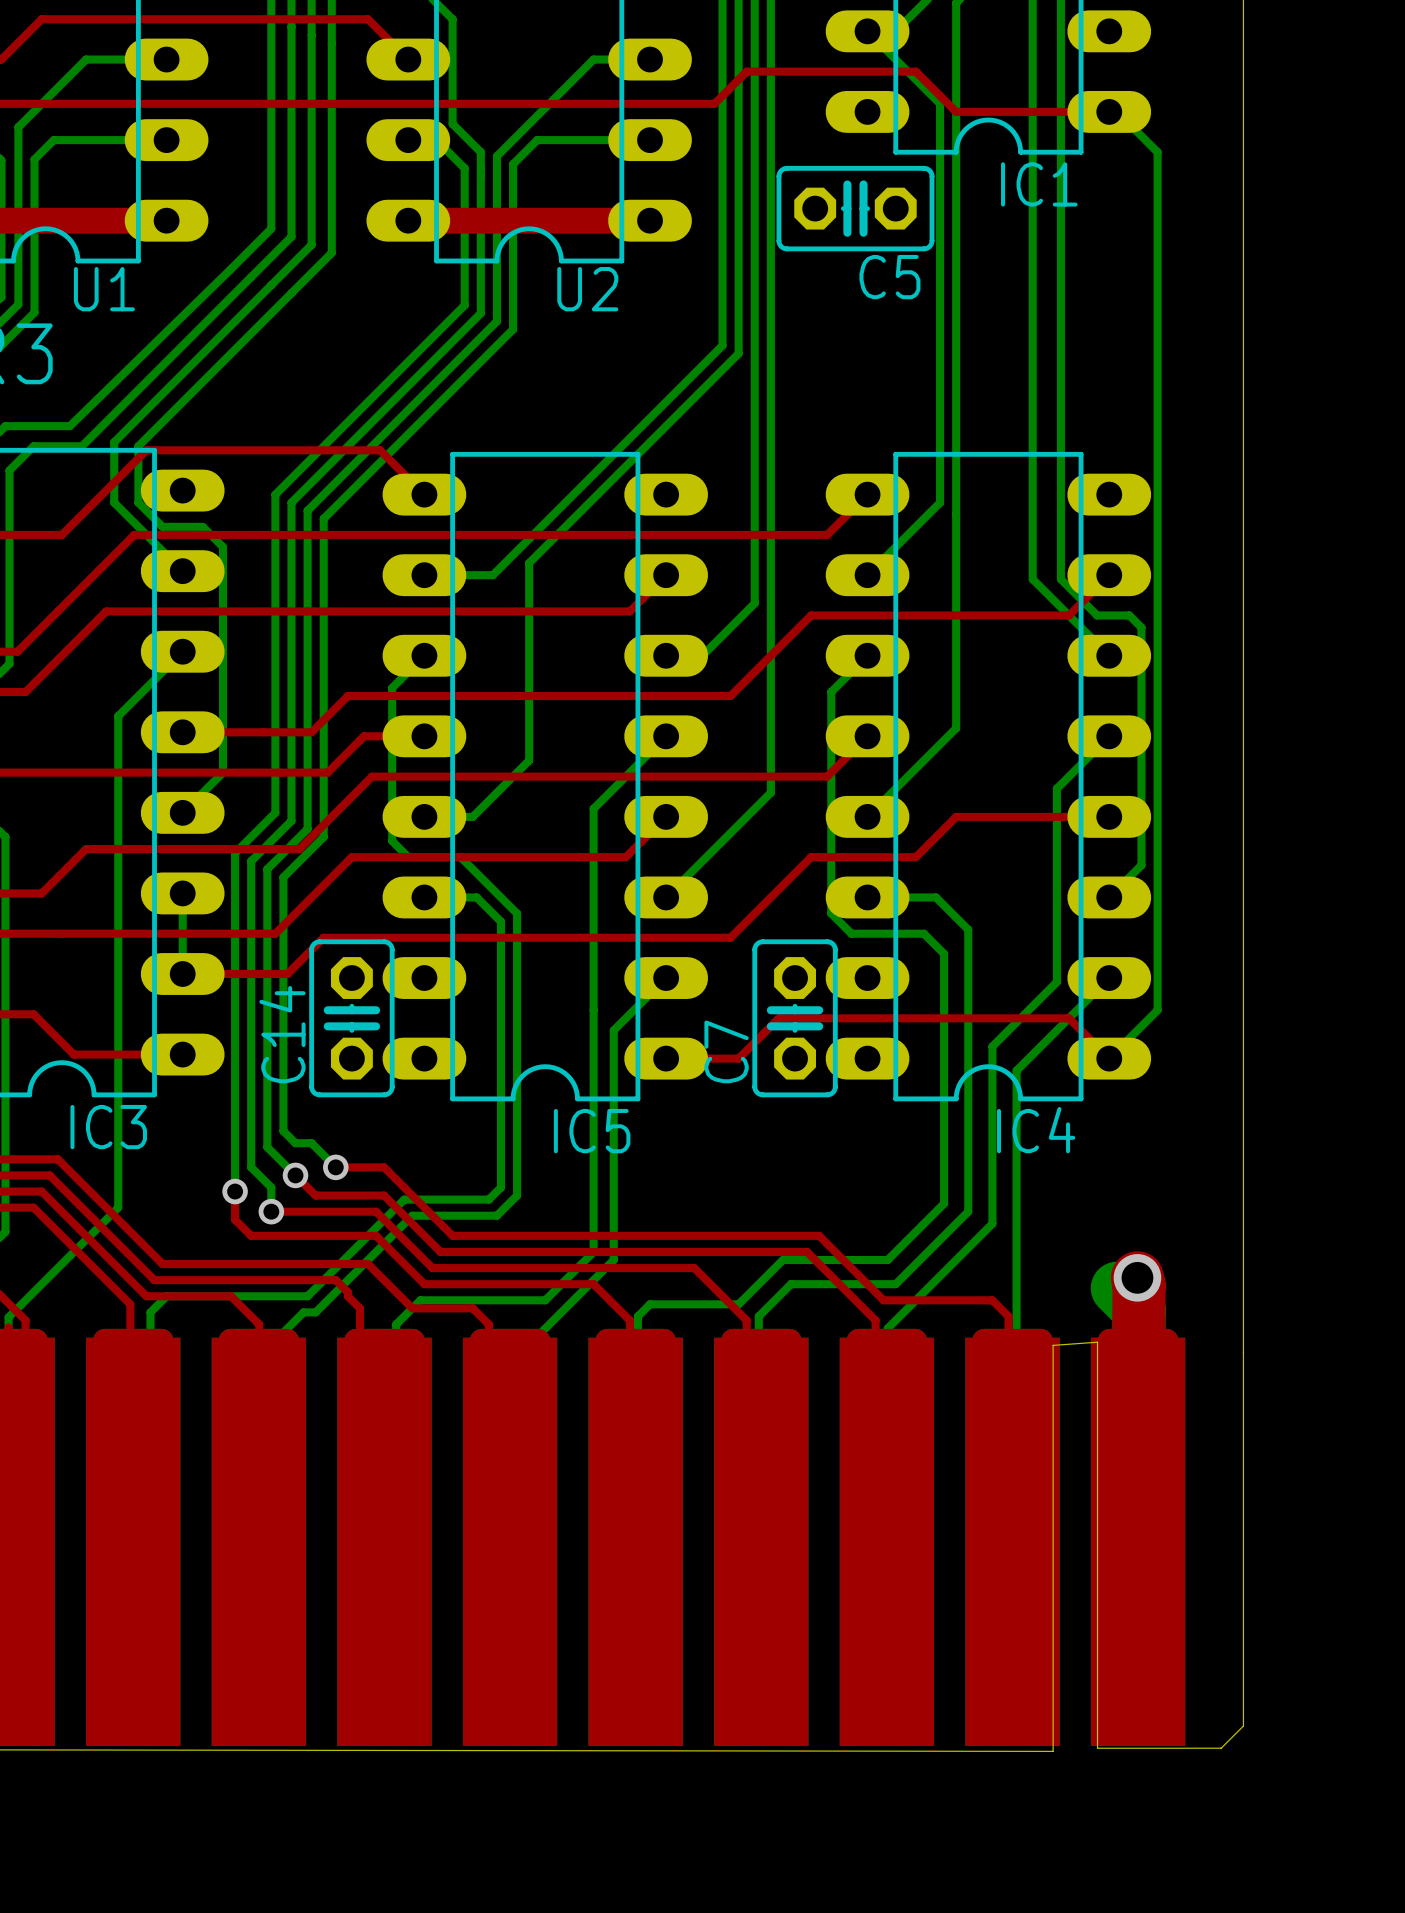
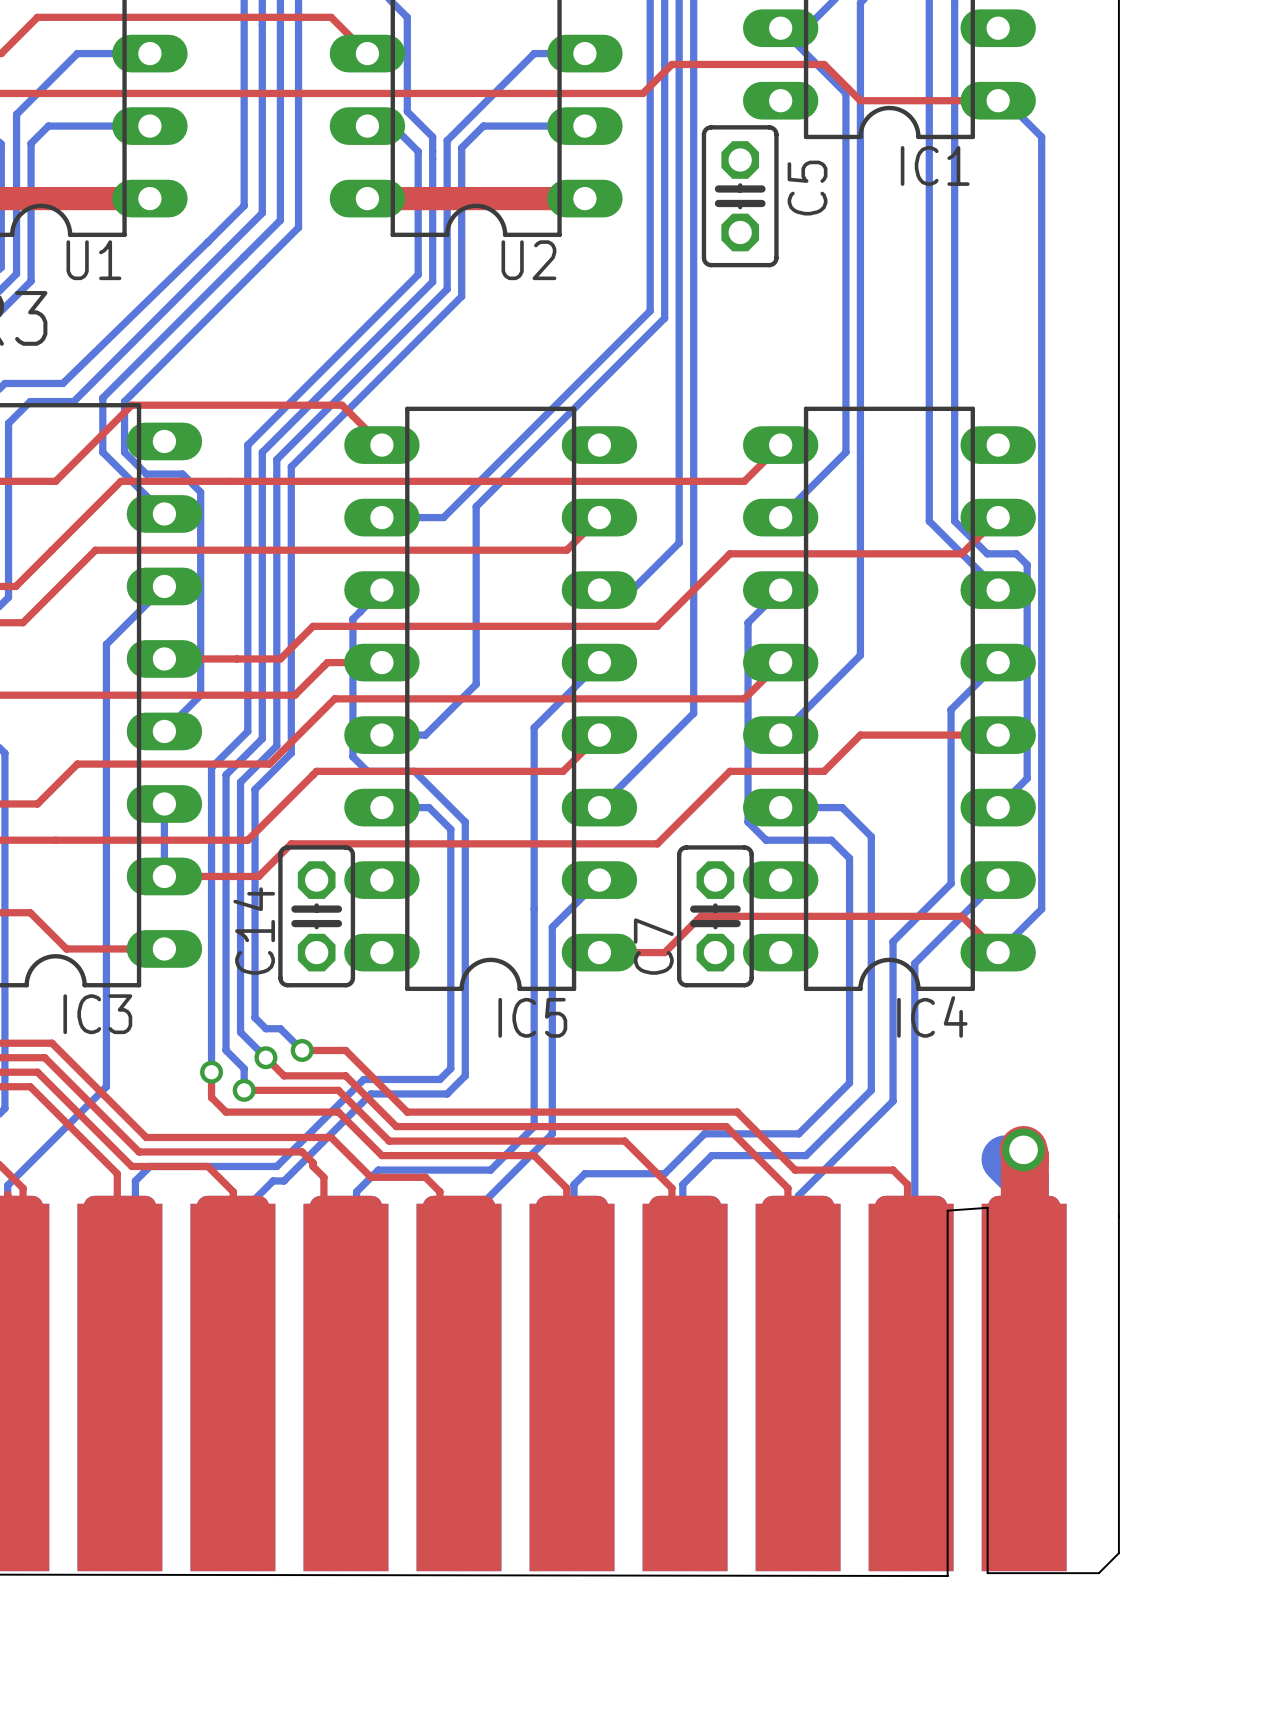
C5 rotation: 0° (855, 208) -> 90° clockwise (740, 196)
C5 name position: C5 (889, 277) -> C5 (807, 188)

